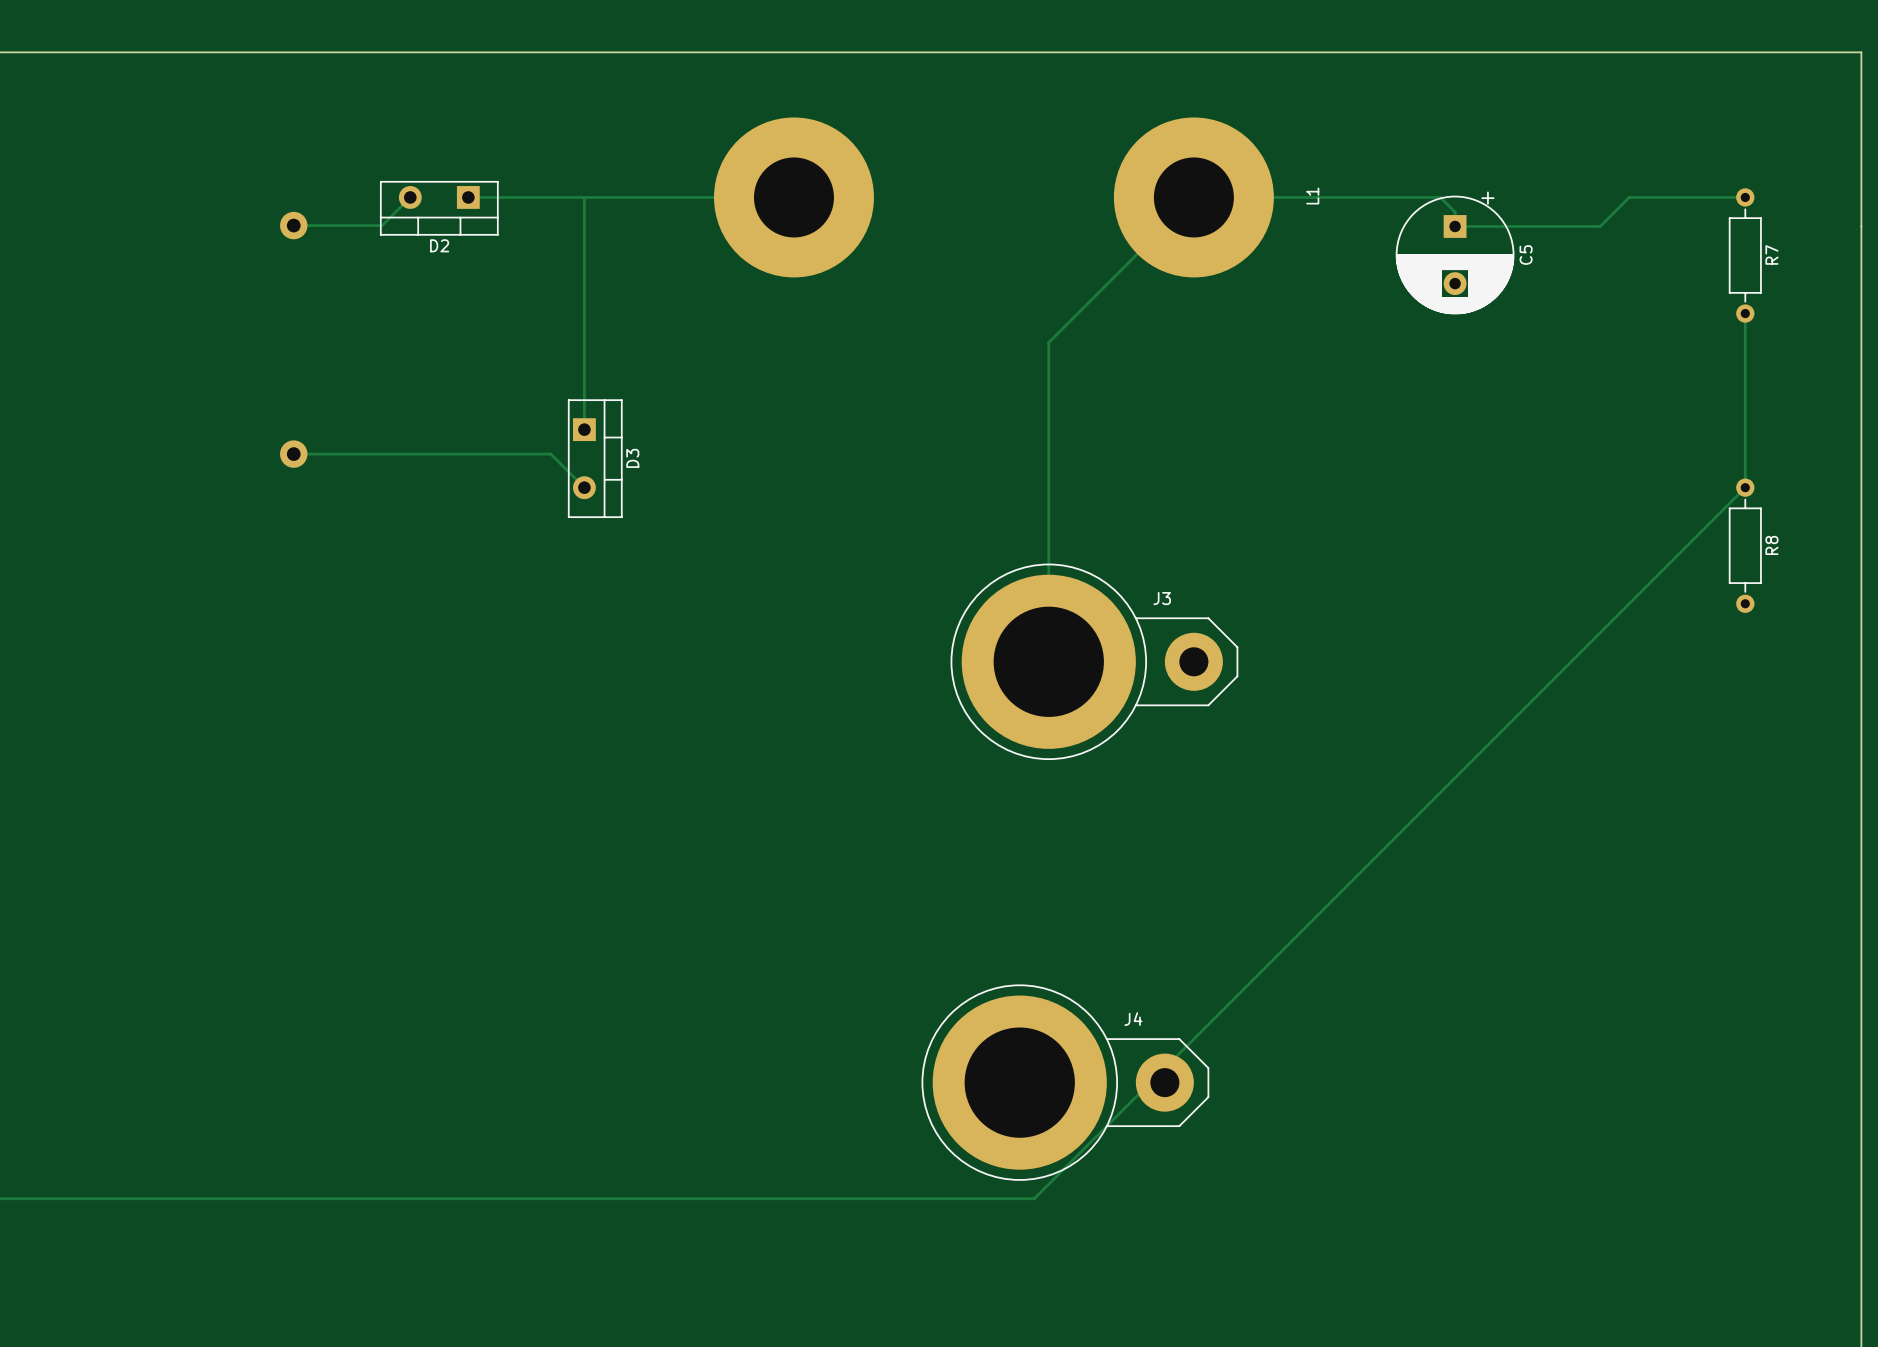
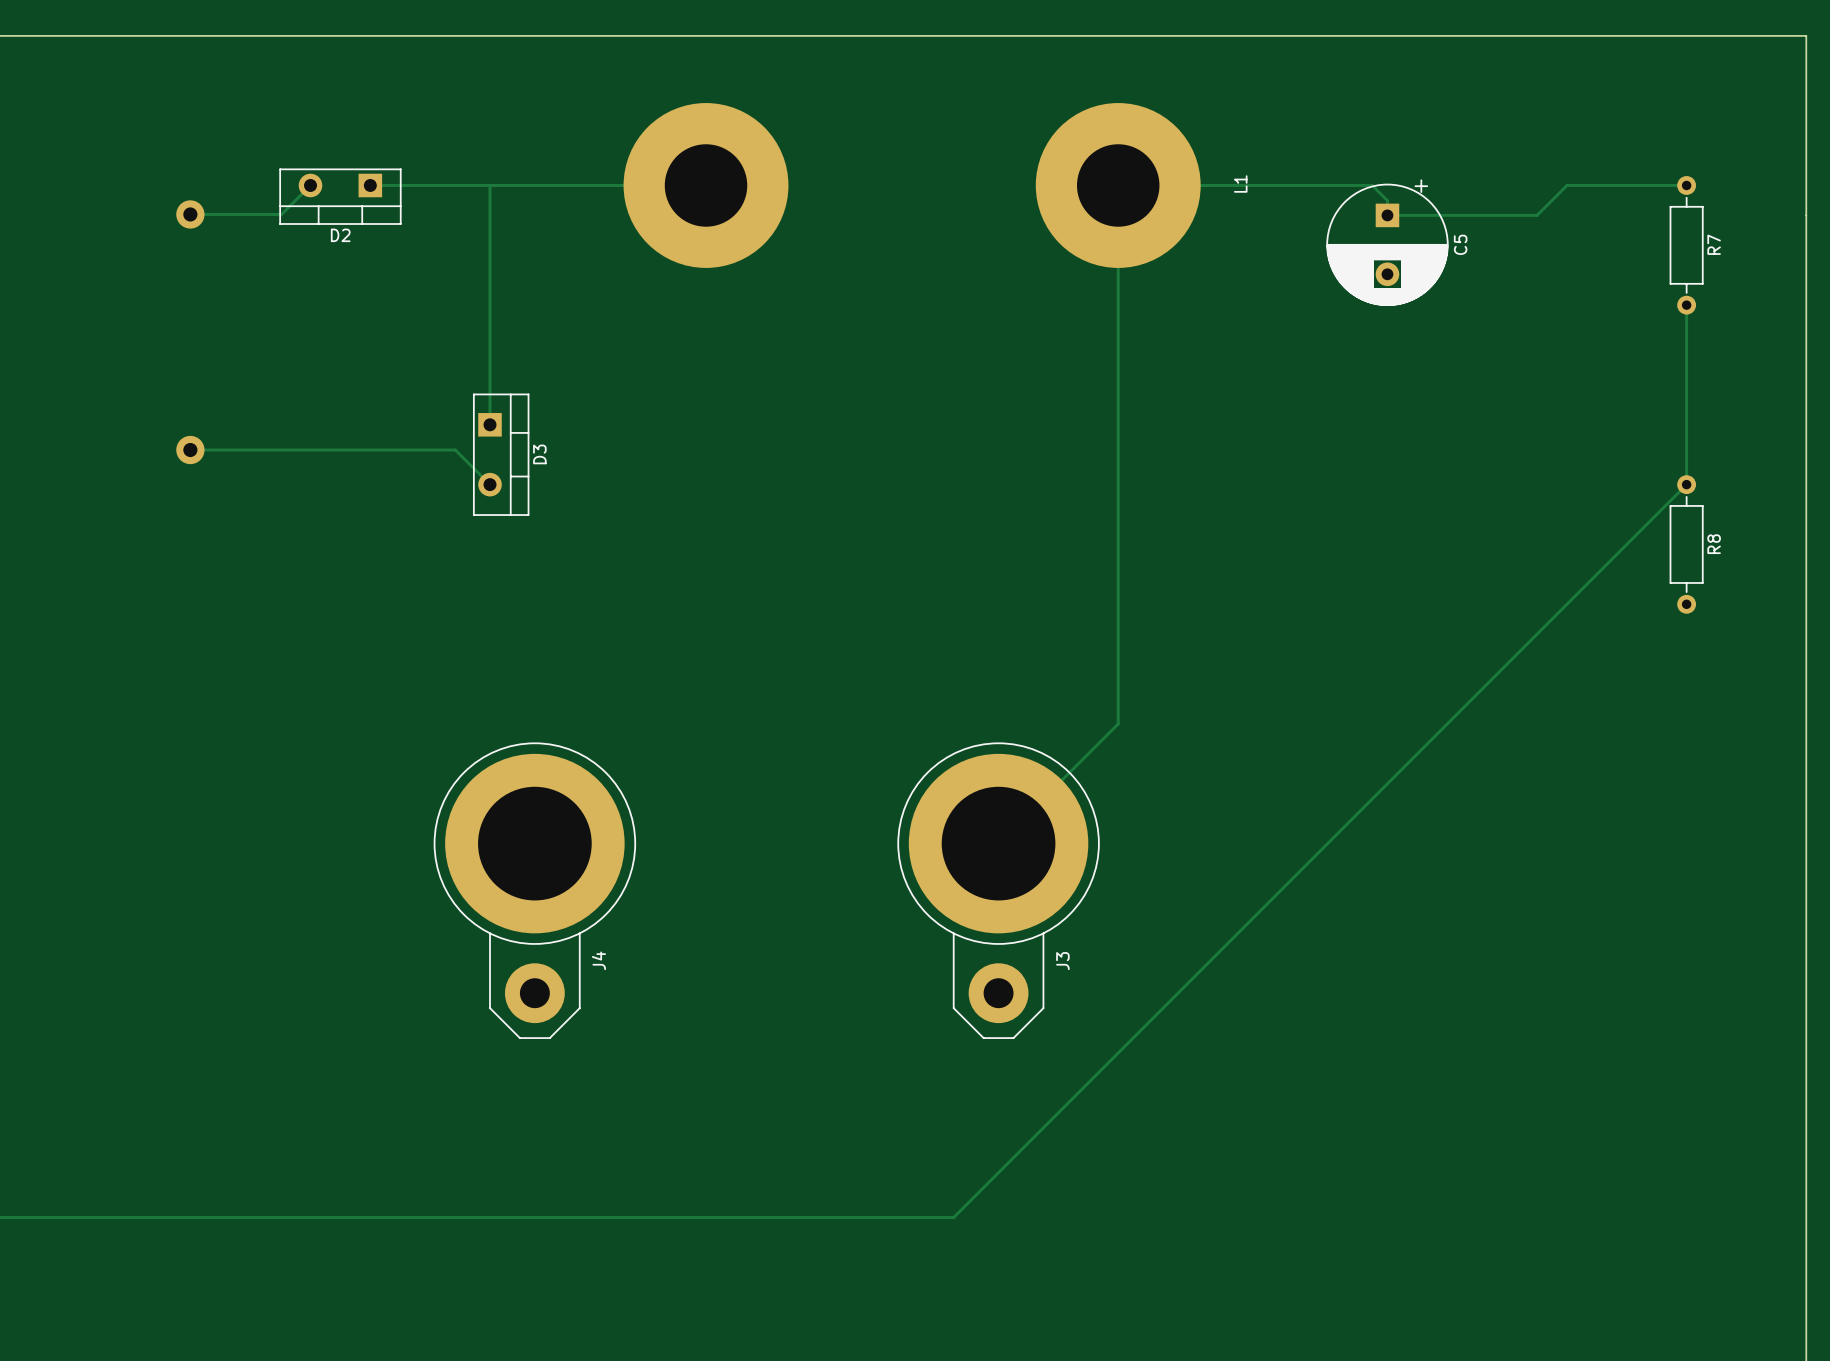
track: (1193, 197) (1048, 342) (1048, 661) -> (1118, 185) (1118, 723) (998, 843)
J3 rotation: 0° (1094, 661) -> 90° clockwise (998, 890)
J3 position: (1094, 661) -> (998, 890)
J4 rotation: 0° (1065, 1082) -> 90° clockwise (534, 890)
J4 position: (1065, 1082) -> (534, 890)

